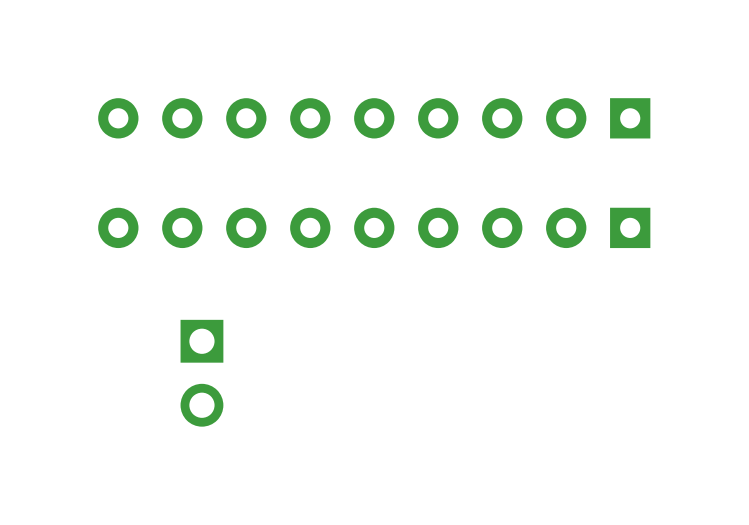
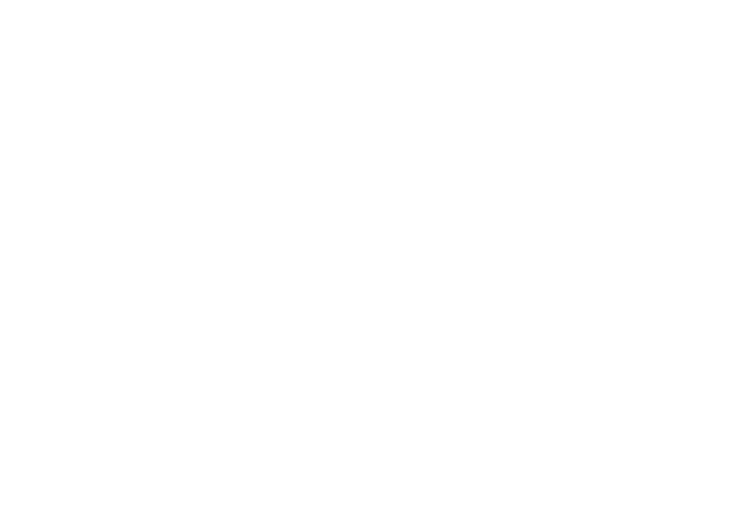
part: (374, 118) -> none
part: (374, 227) -> none
part: (201, 373) -> none

